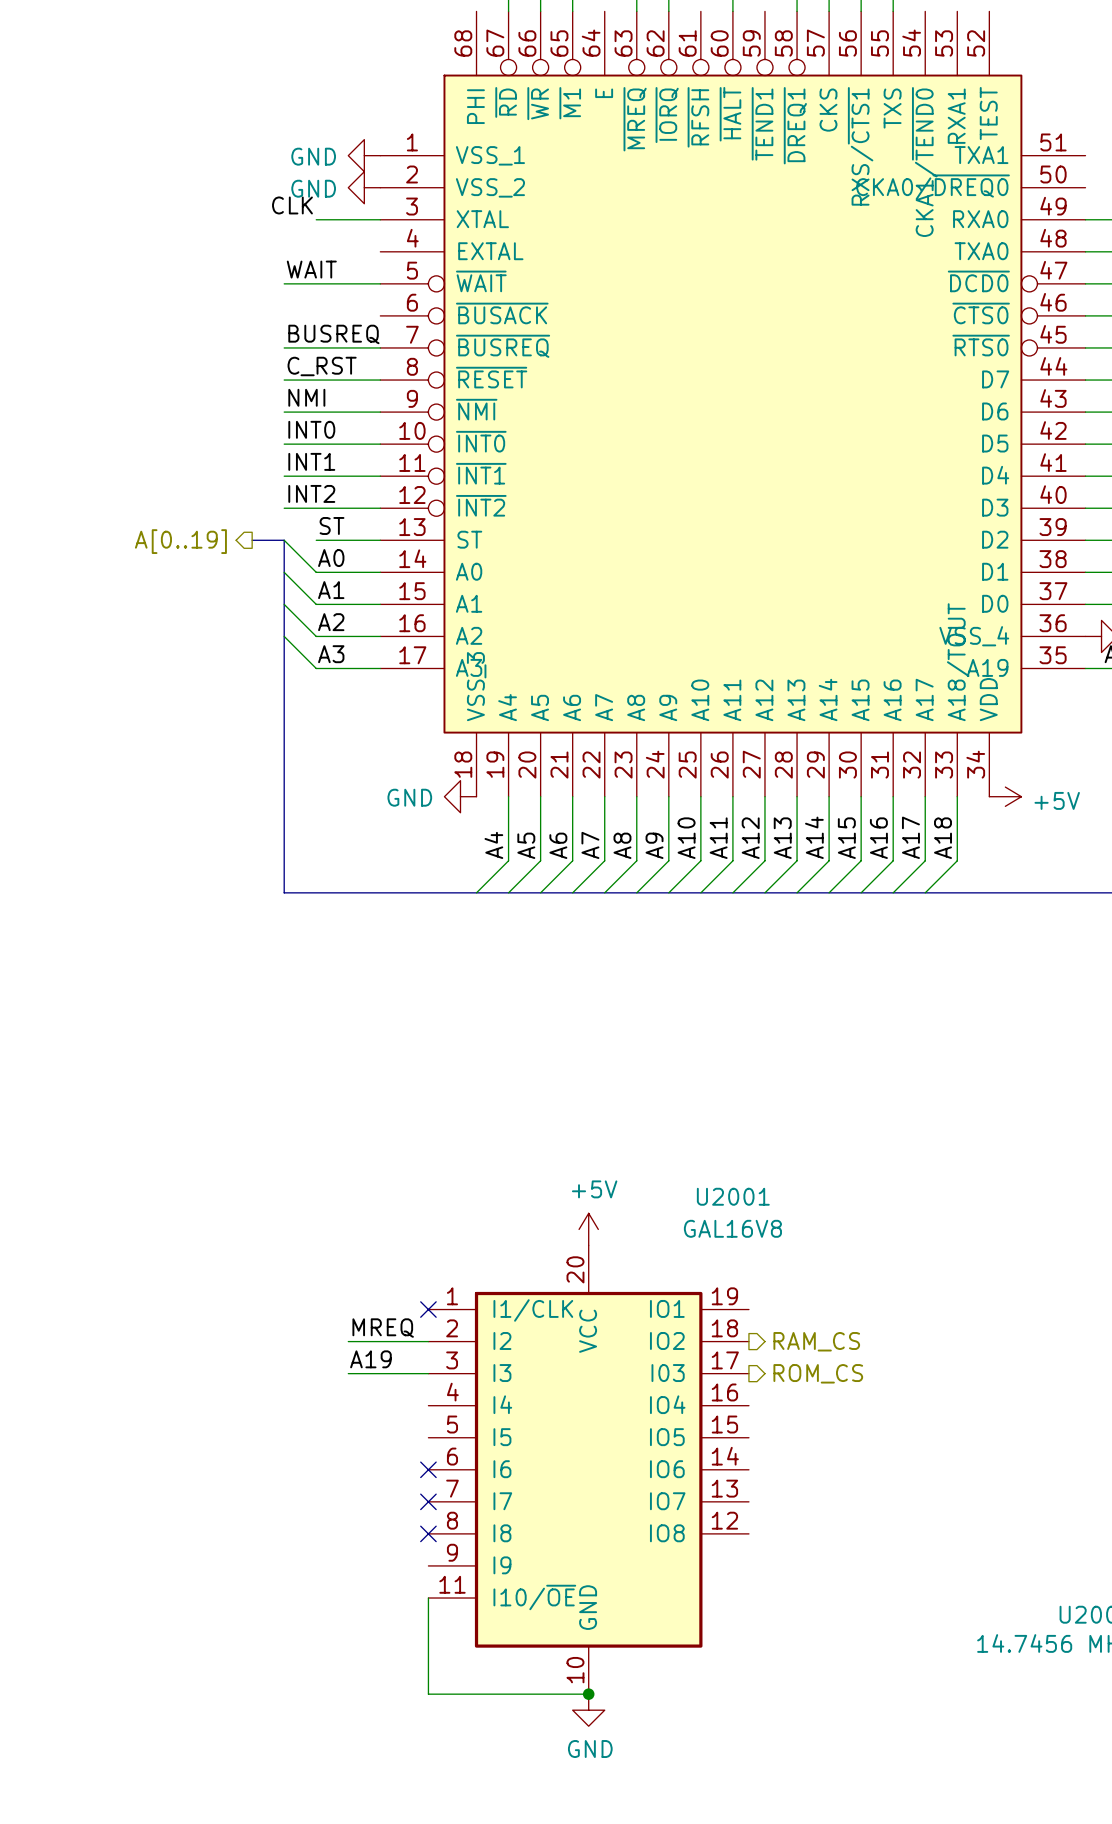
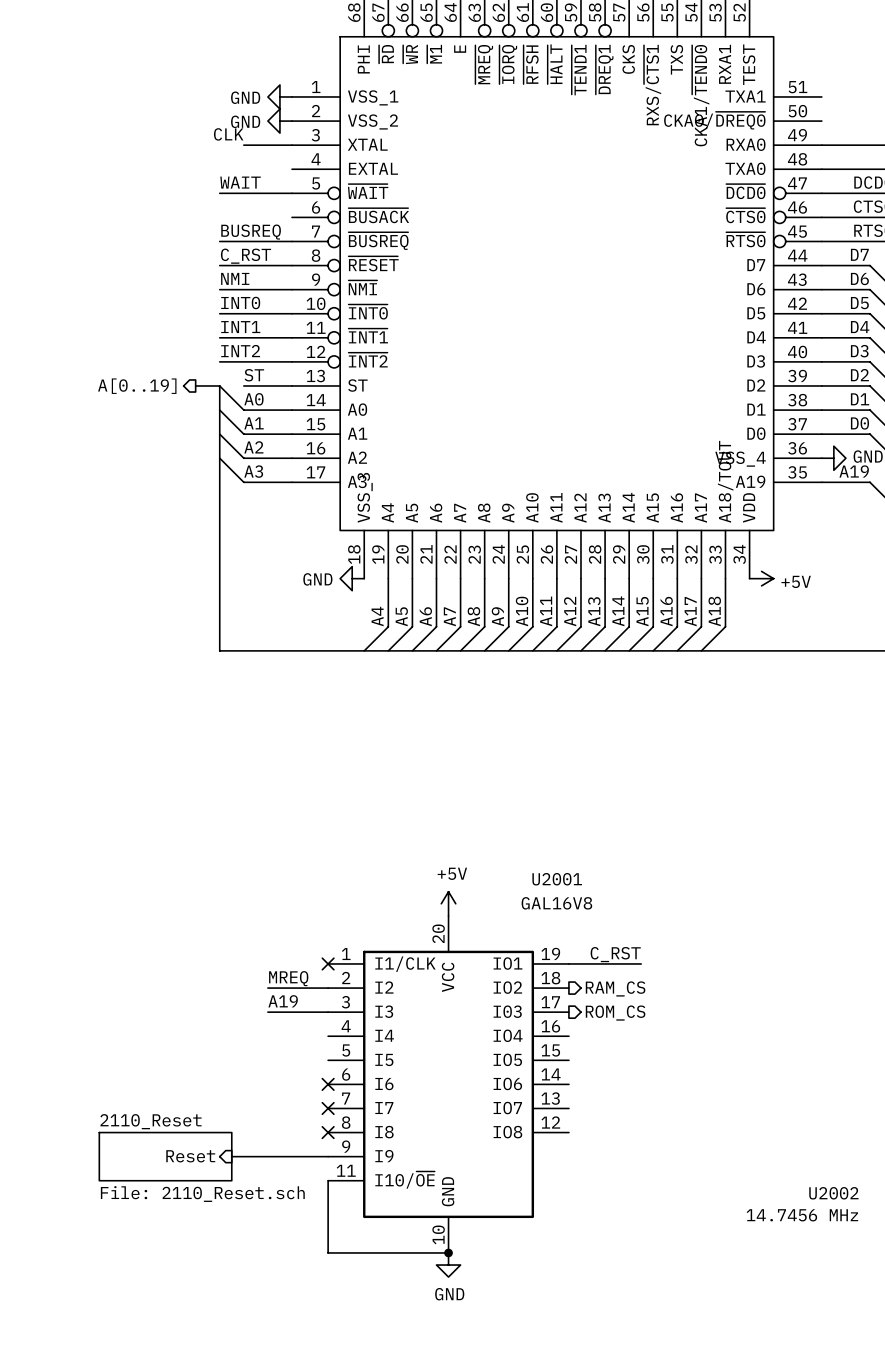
label: none -> C_RST (615, 954)
wire: none -> (568, 963) (641, 963)
sheet 2110_Reset: none -> File: 2110_Reset.sch (165, 1156)
sheet pin: none -> Reset (190, 1156)
wire: none -> (231, 1156) (328, 1156)

